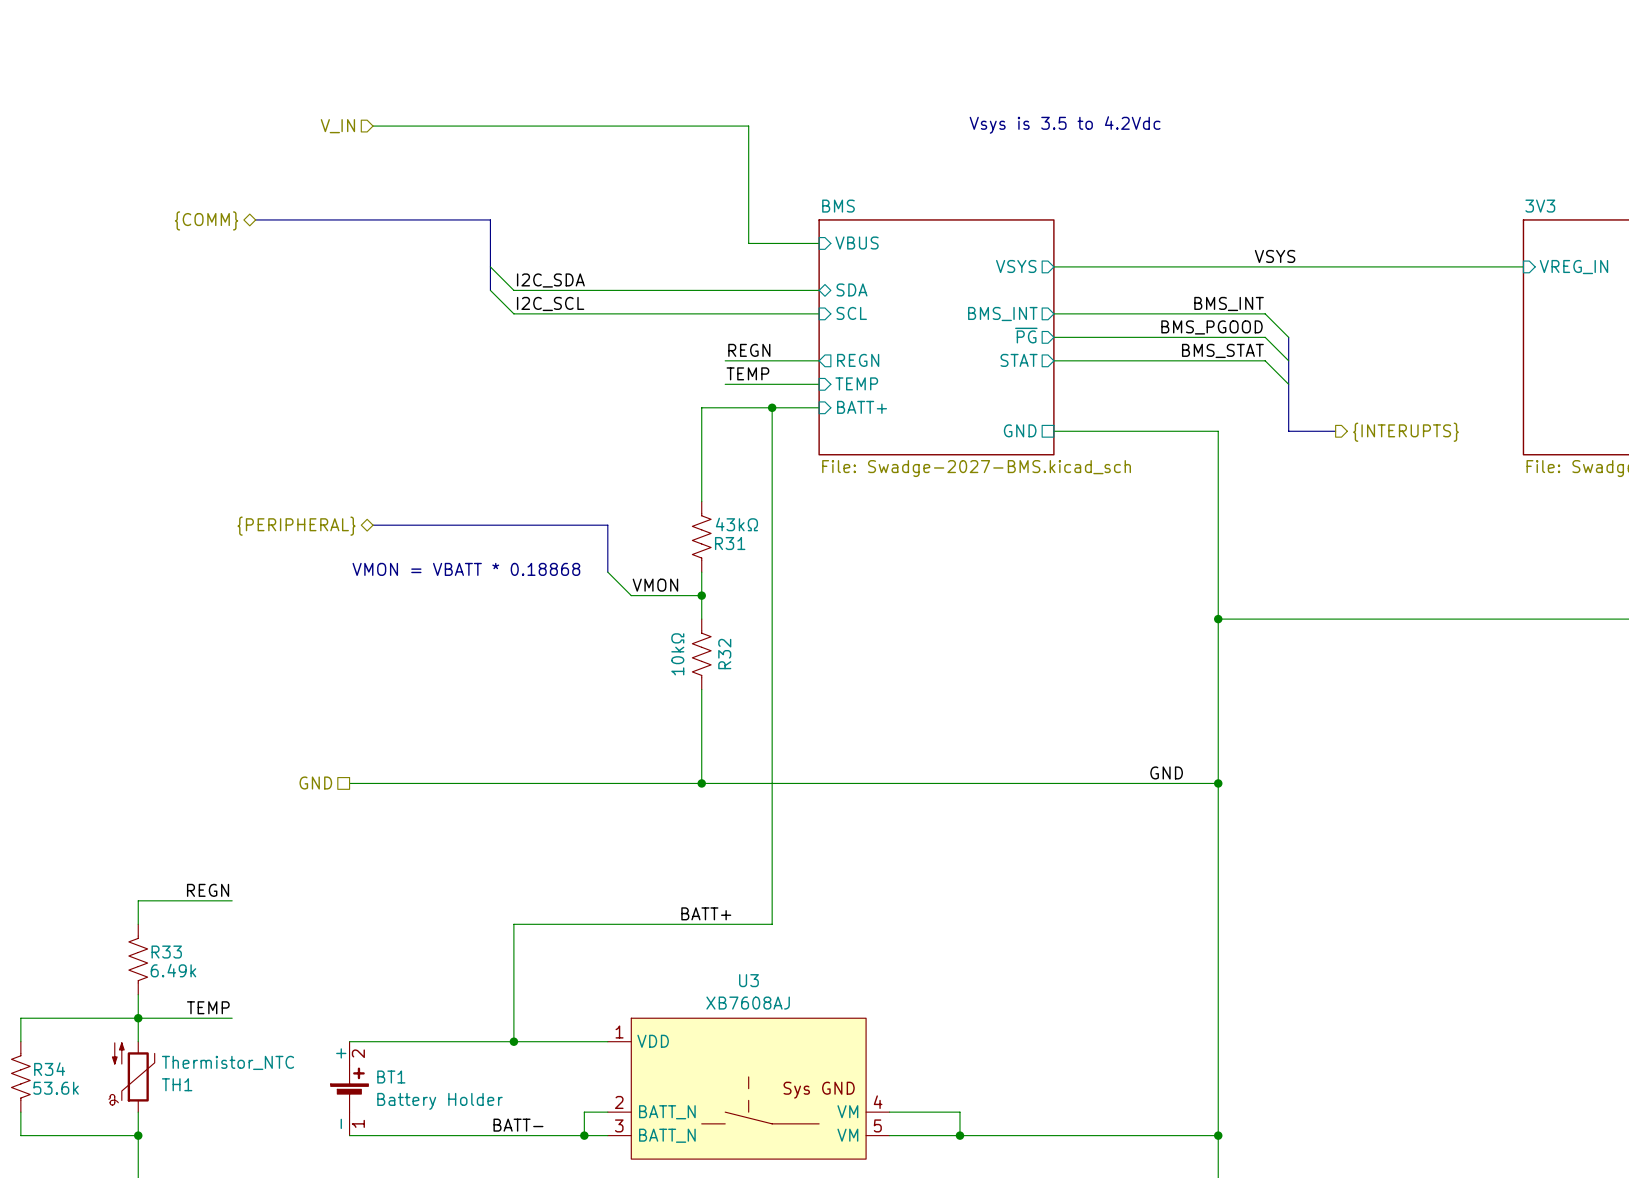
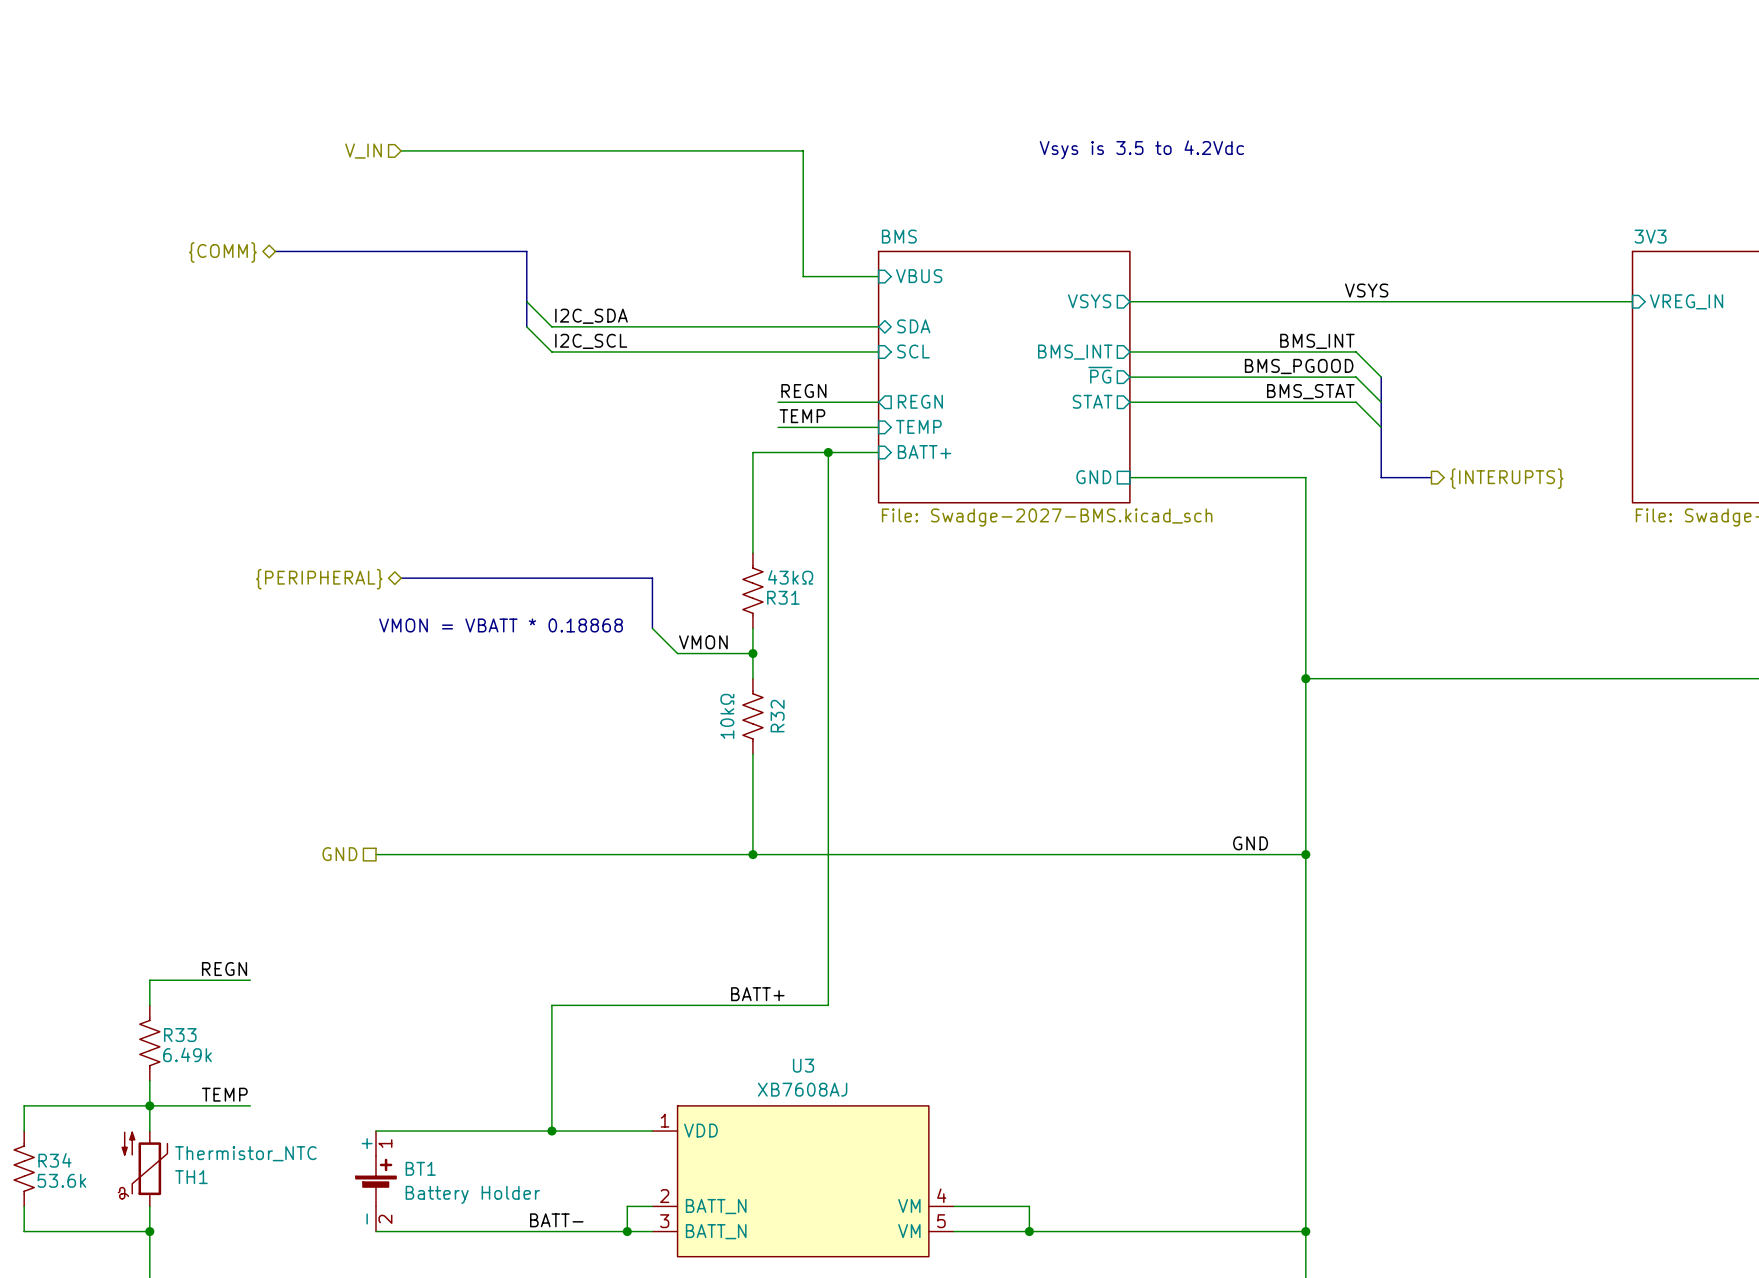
U3 symbol: [607, 1018, 890, 1160] -> [652, 1105, 955, 1257]
BT1 pin number: 2 (358, 1053) -> 1 (385, 1143)
BT1 pin number: 1 (358, 1123) -> 2 (385, 1219)

